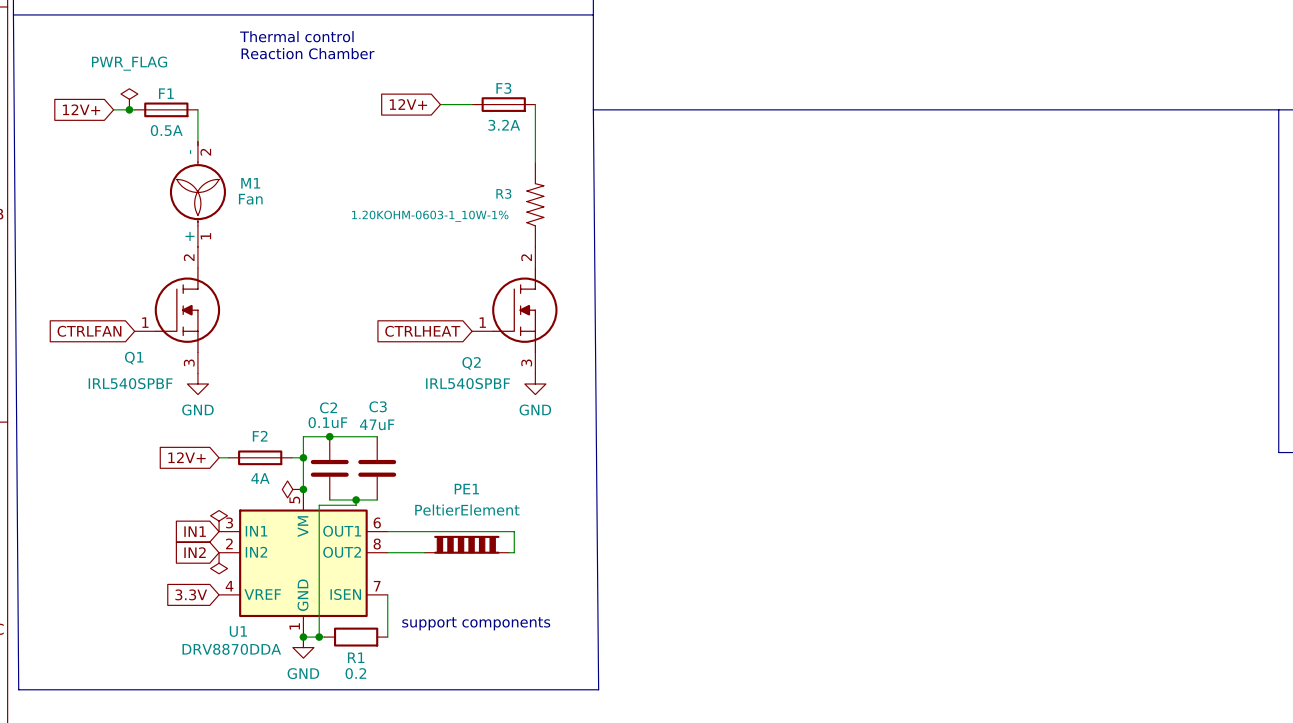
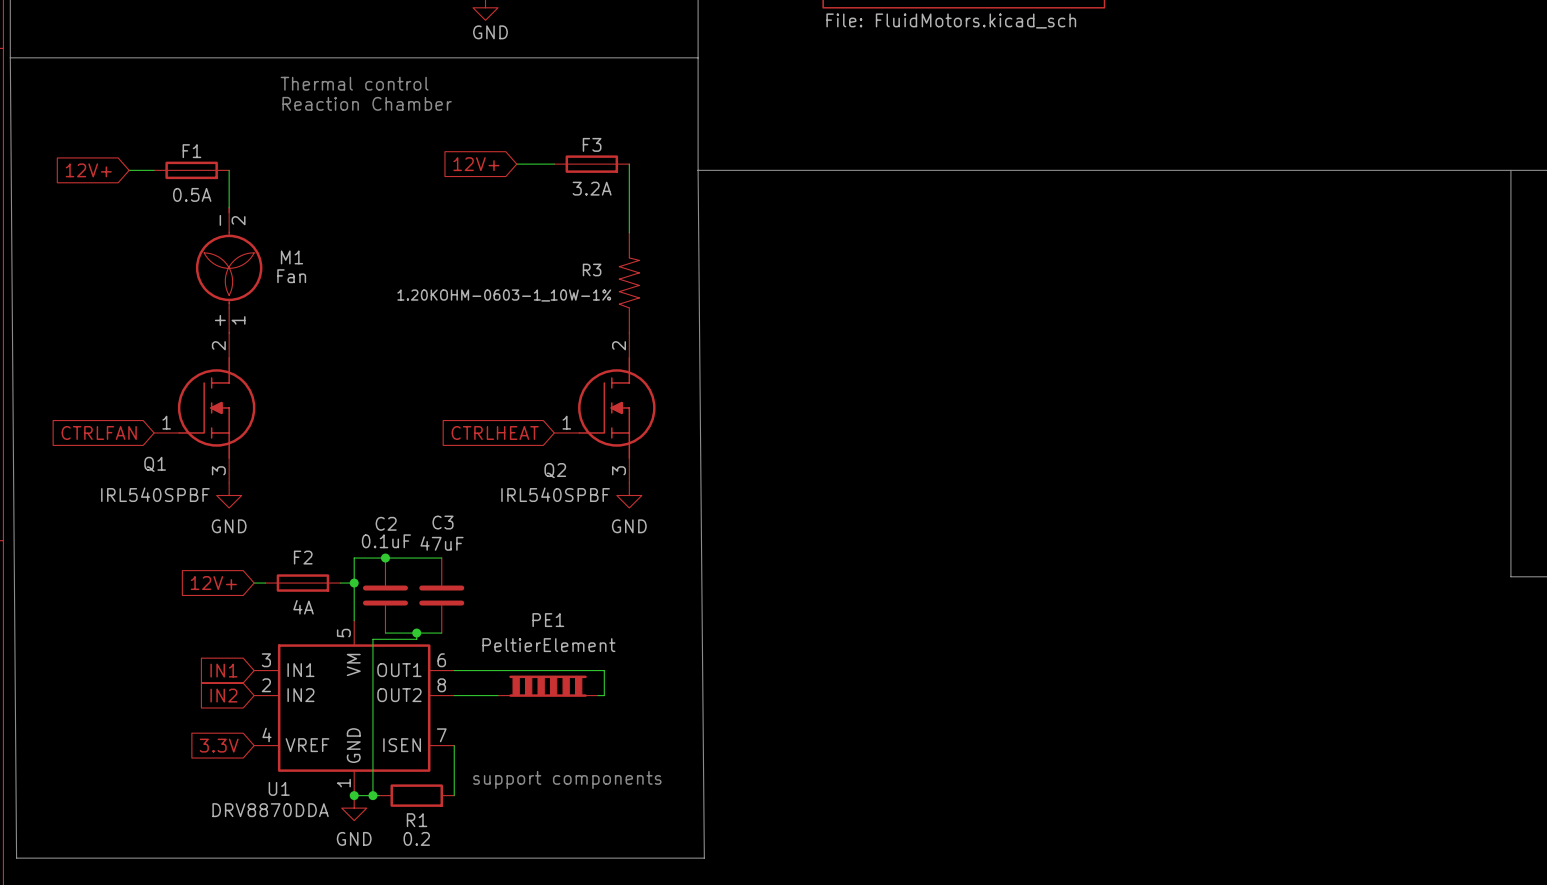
power symbol: PWR_FLAG (129, 99) -> none
junction: (129, 109) -> none
power symbol: (292, 489) -> none
junction: (303, 489) -> none
power symbol: (219, 521) -> none
power symbol: (219, 563) -> none

